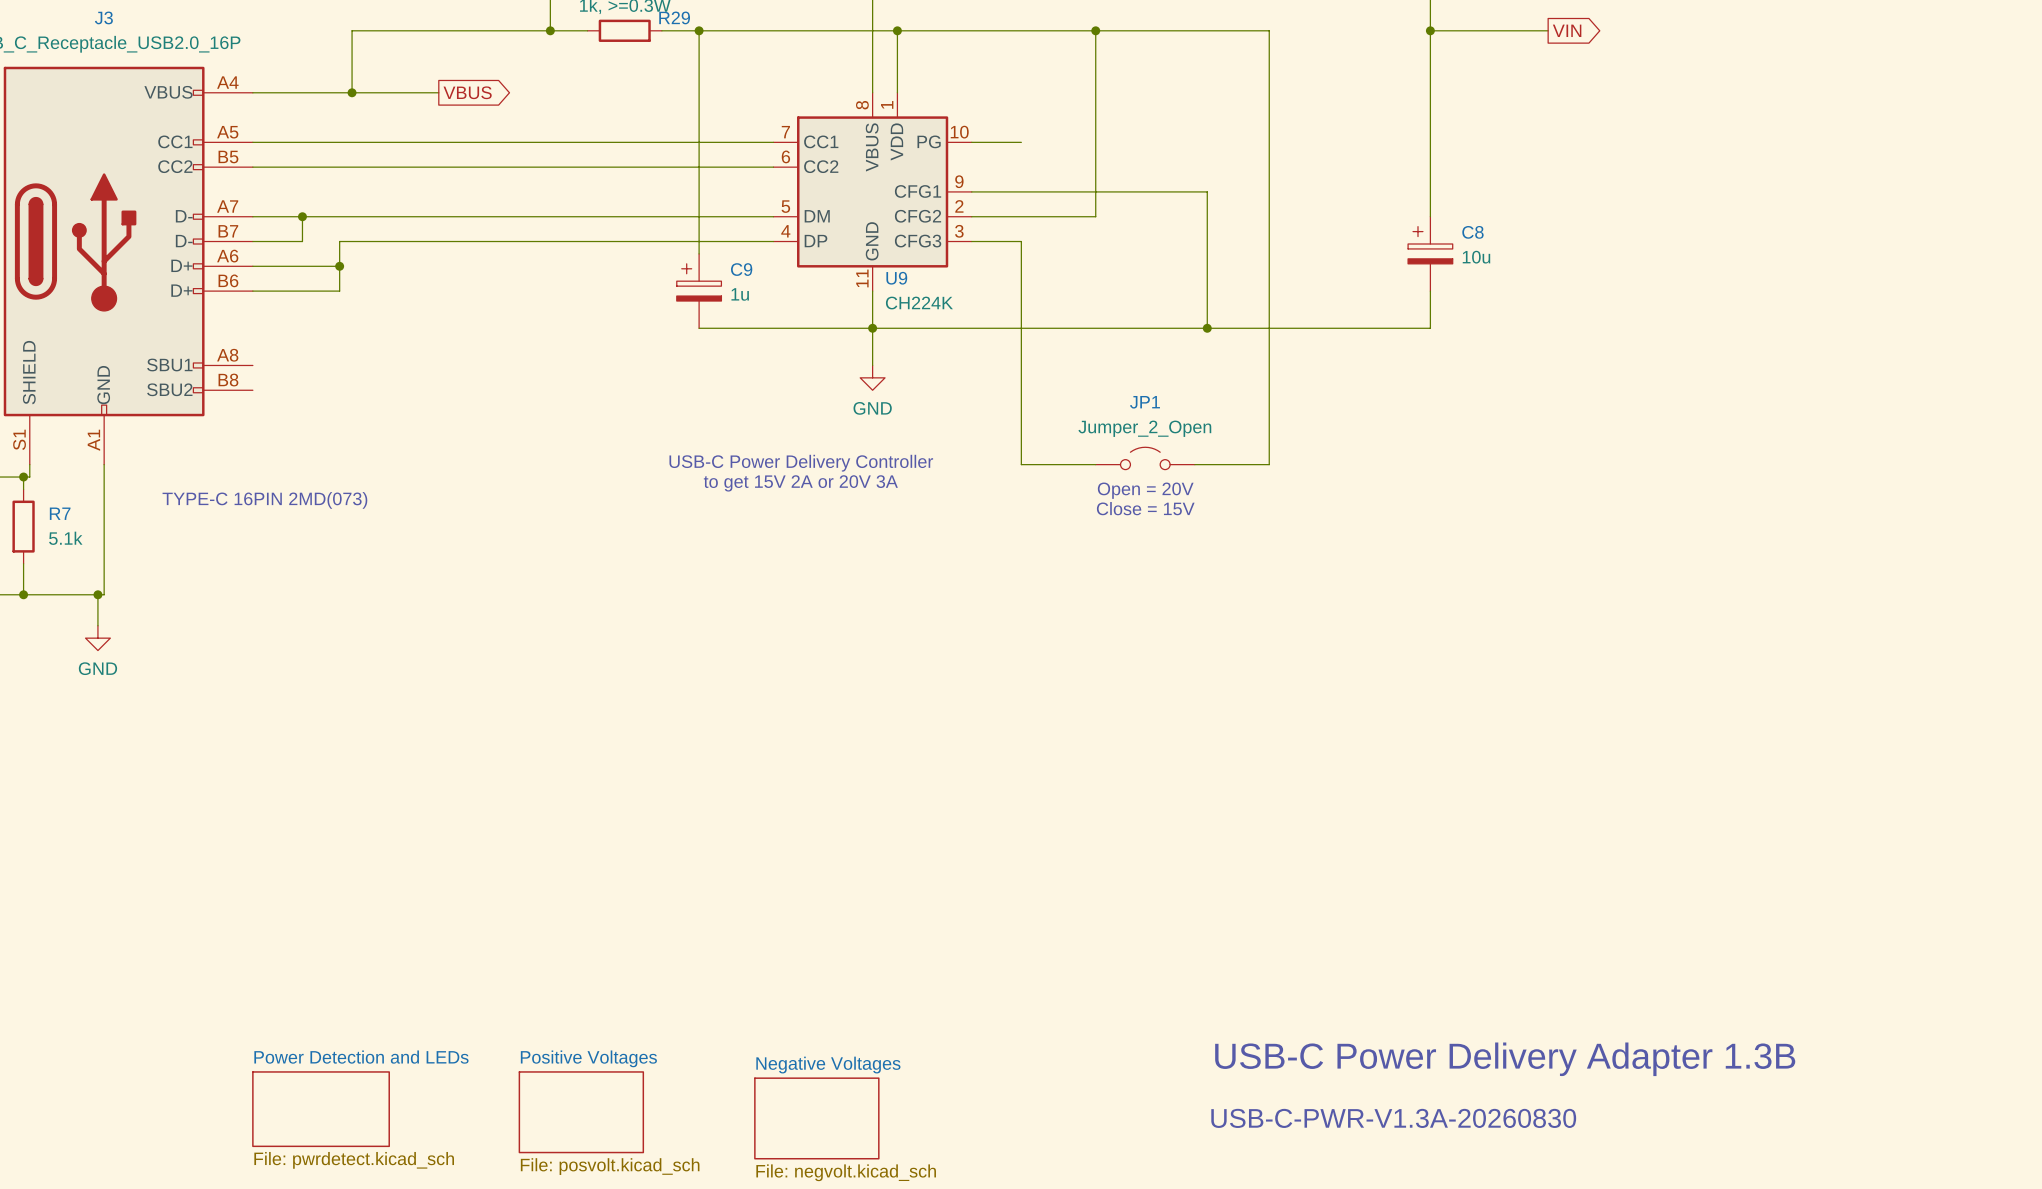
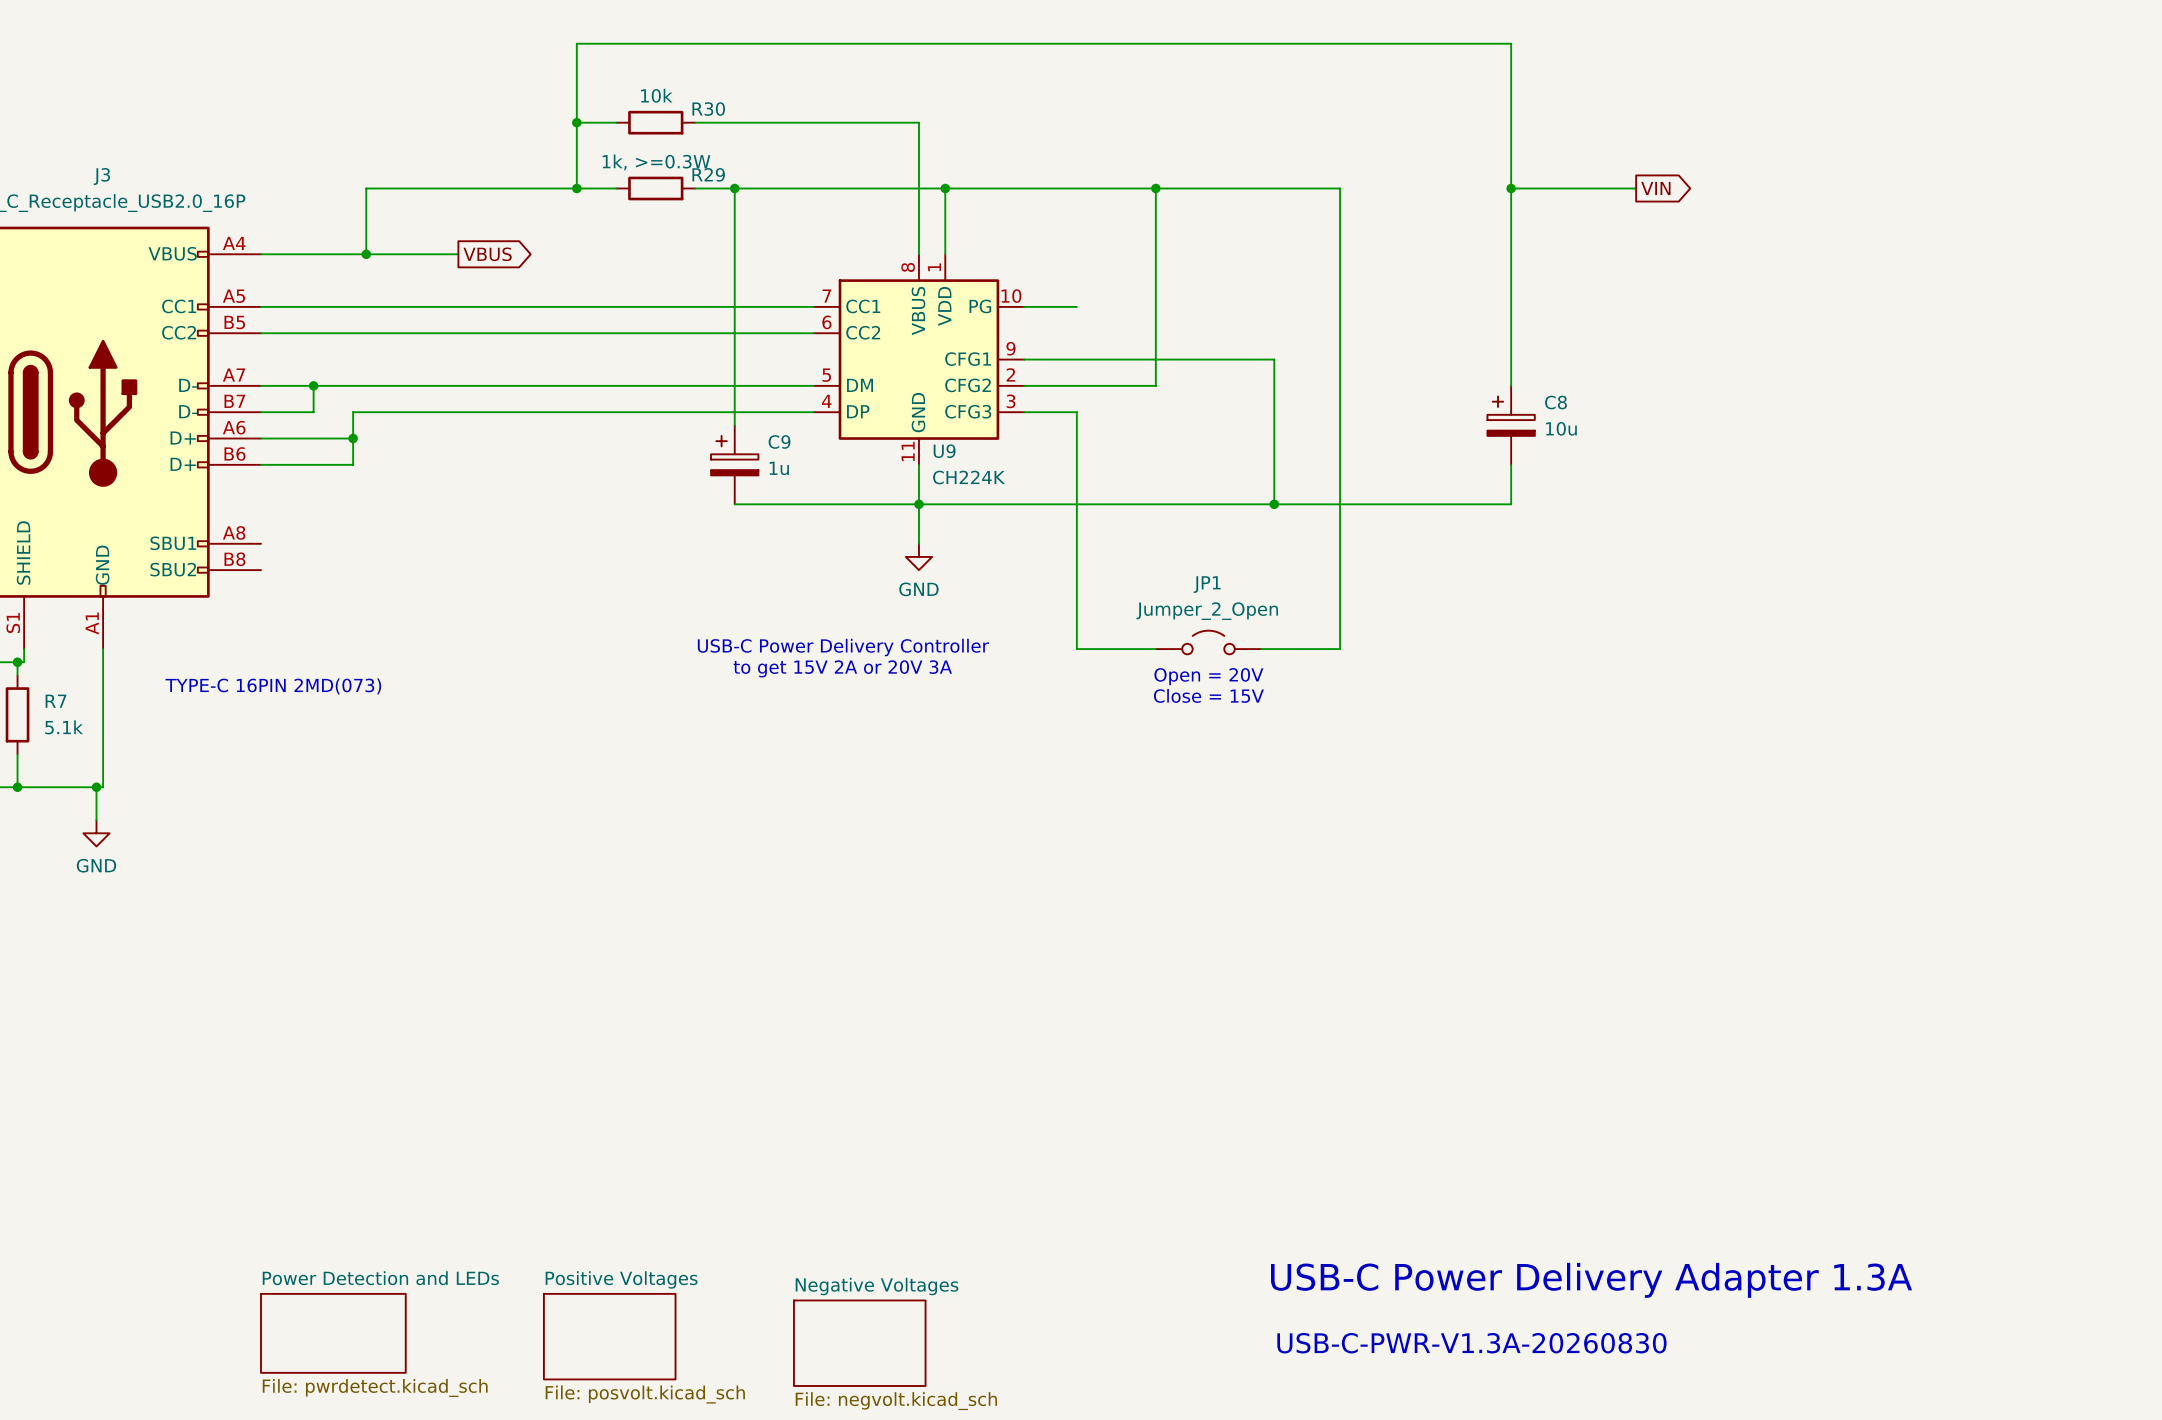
text: USB-C Power Delivery Adapter 1.3B (1505, 1059) -> USB-C Power Delivery Adapter 1.3A (1591, 1280)

